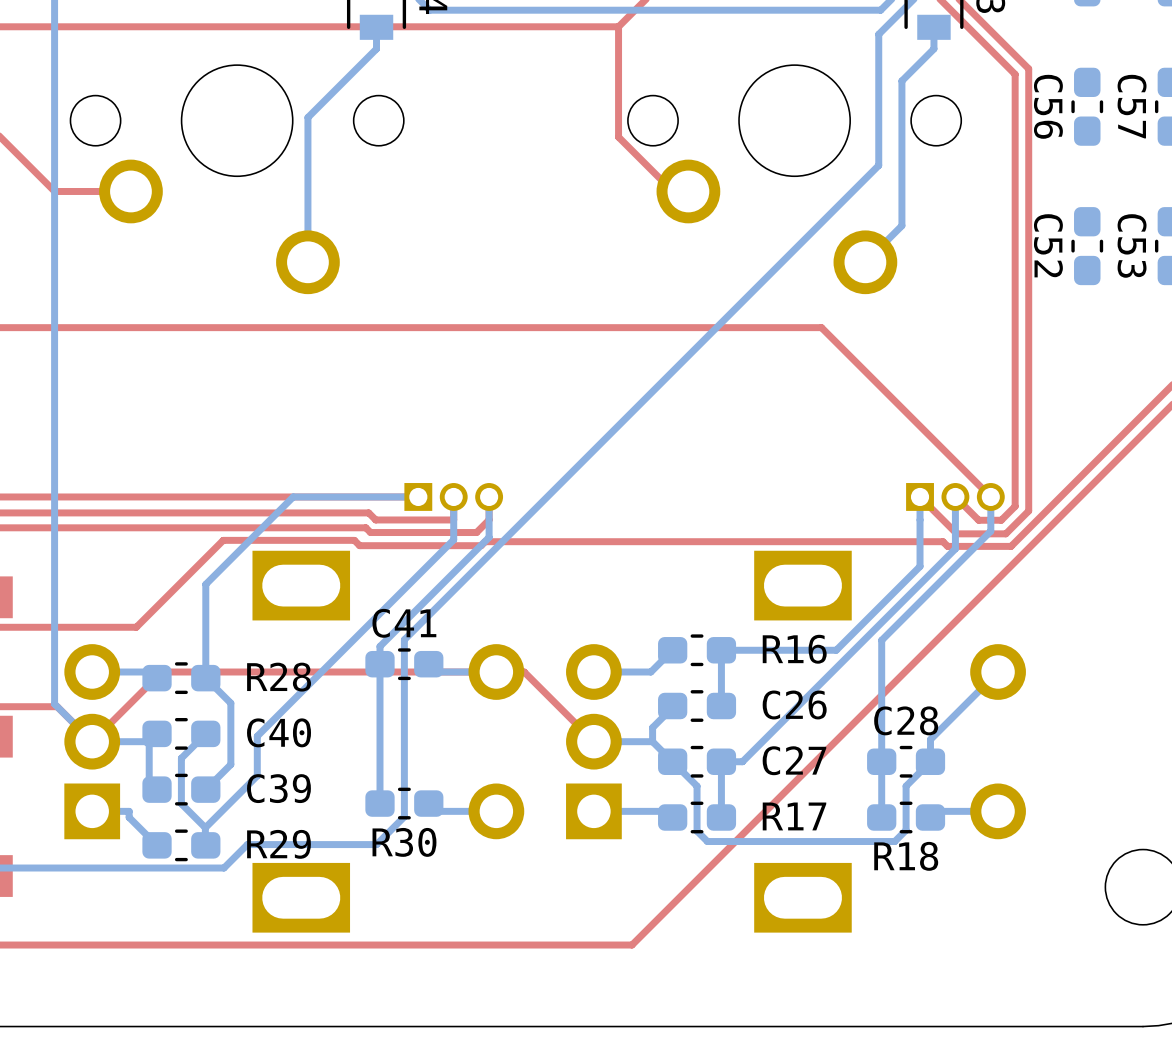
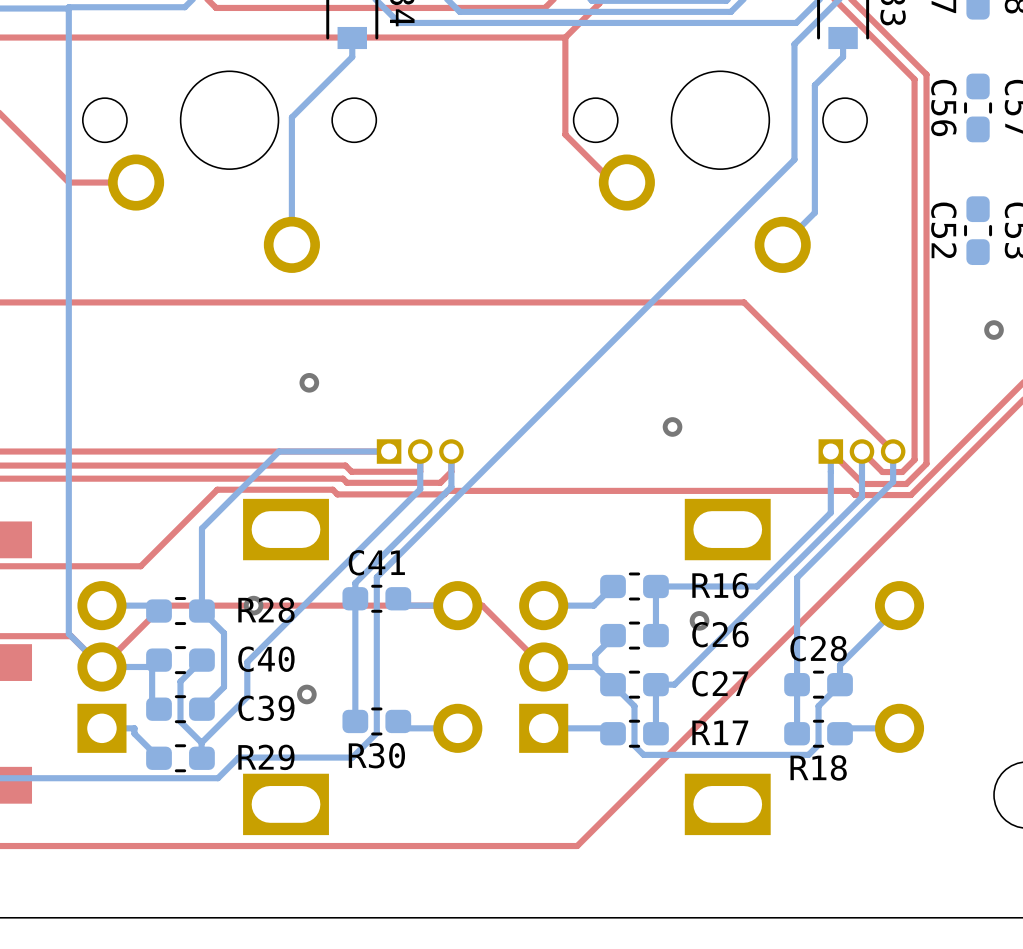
via: none -> (994, 330)
via: none -> (309, 382)
via: none -> (672, 426)
via: none -> (253, 605)
via: none -> (699, 620)
via: none -> (306, 694)

